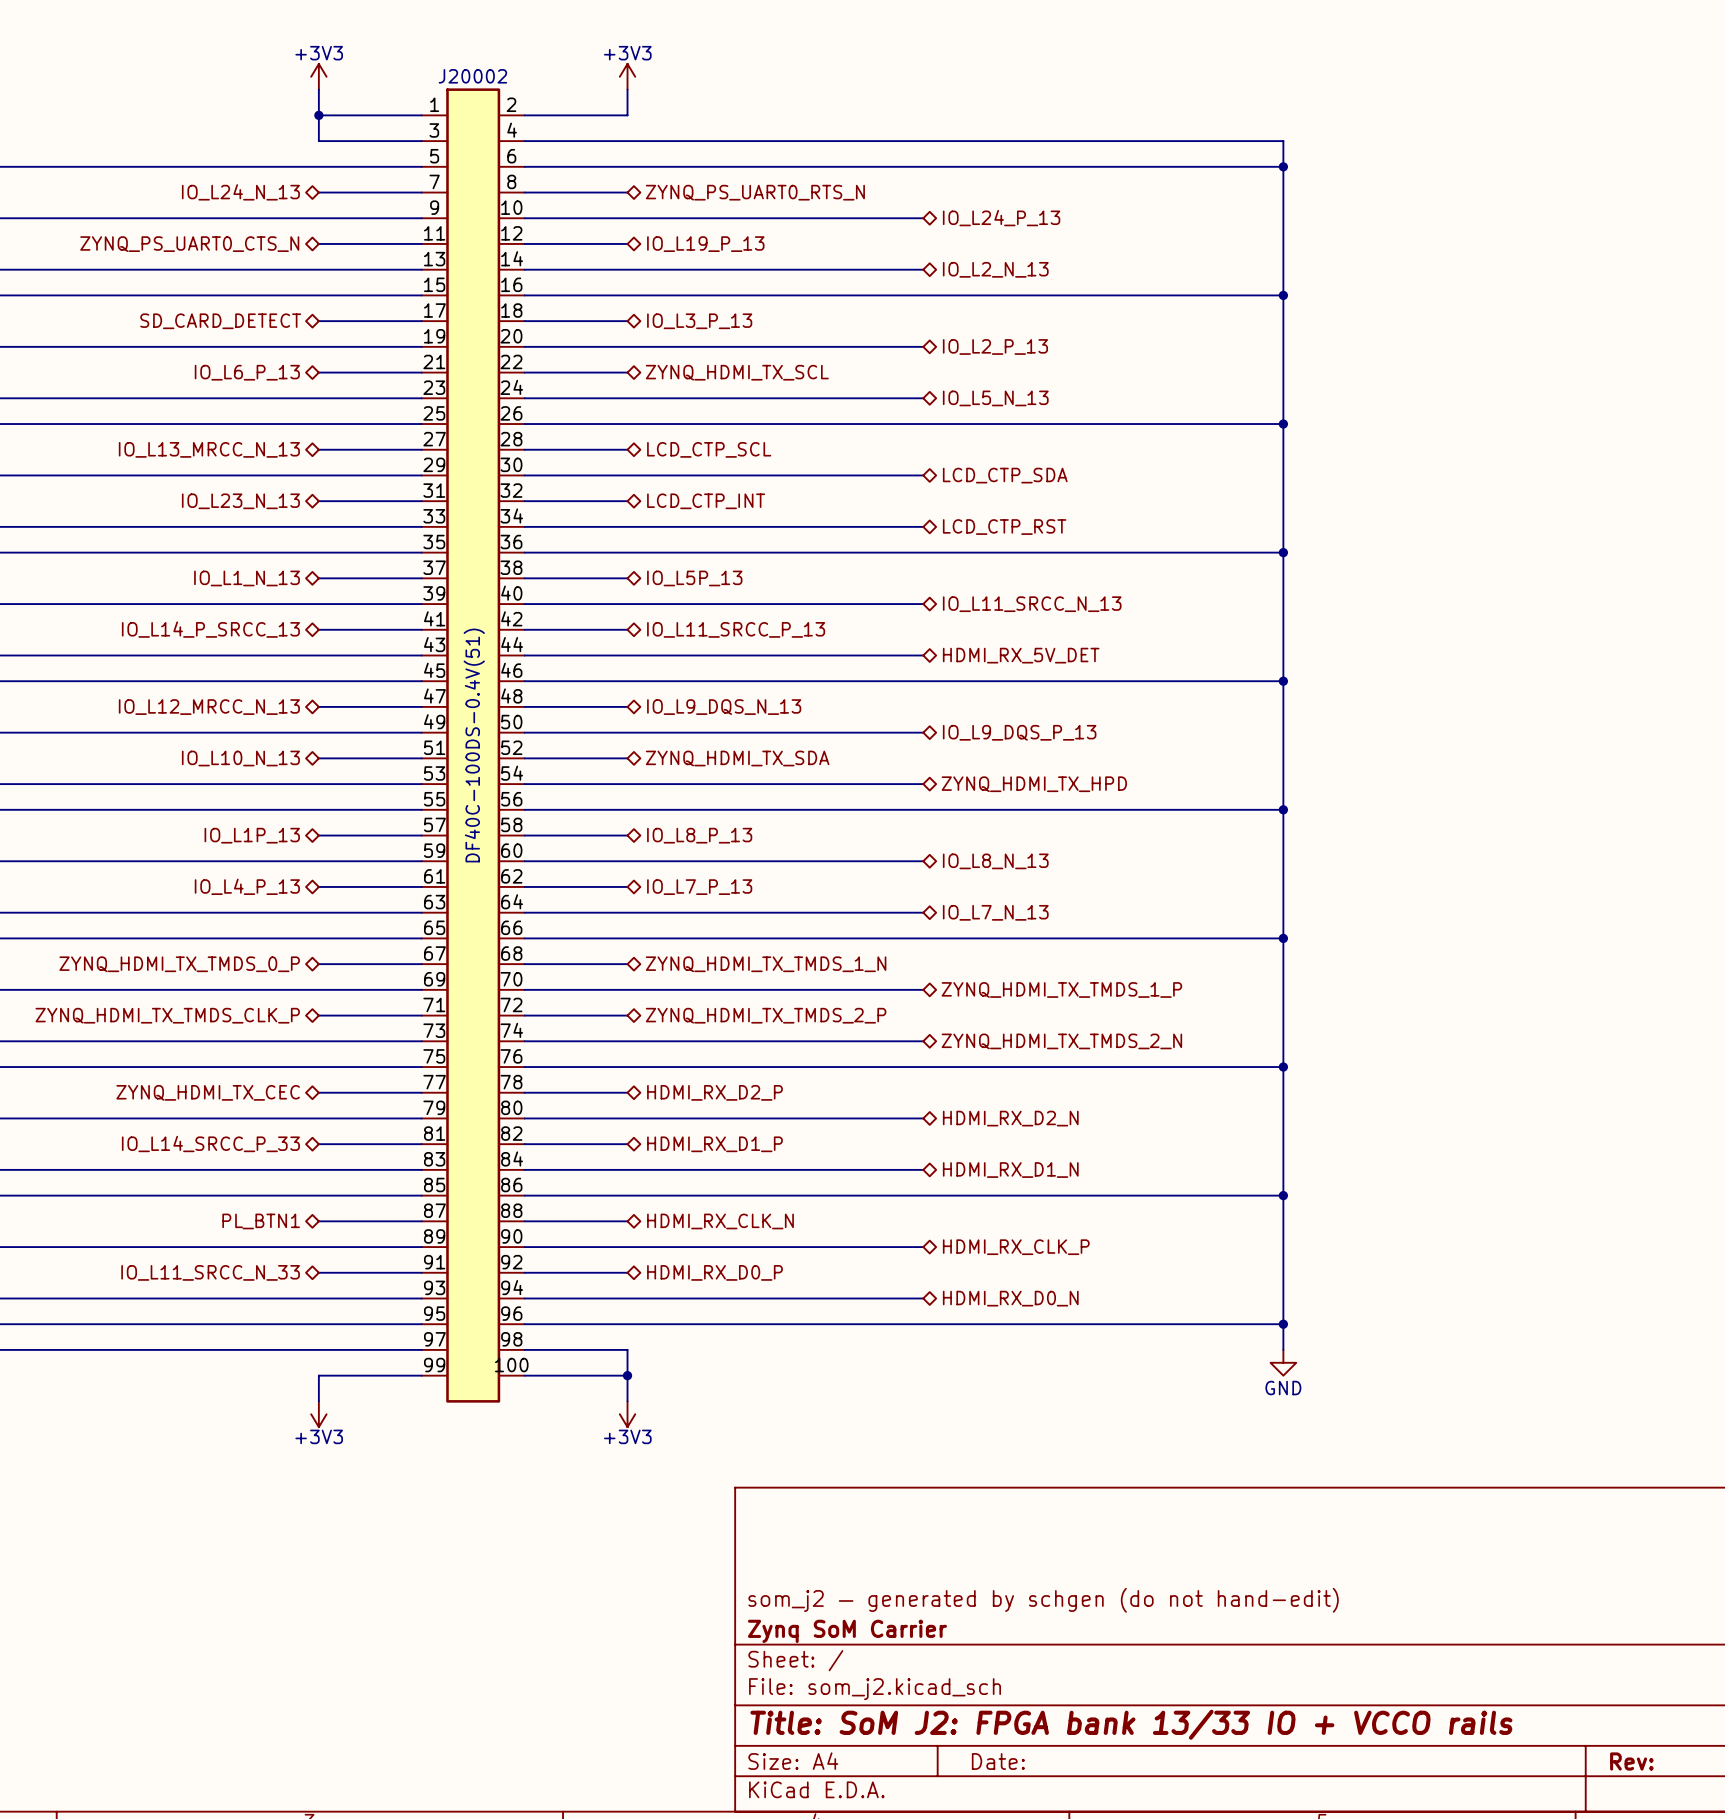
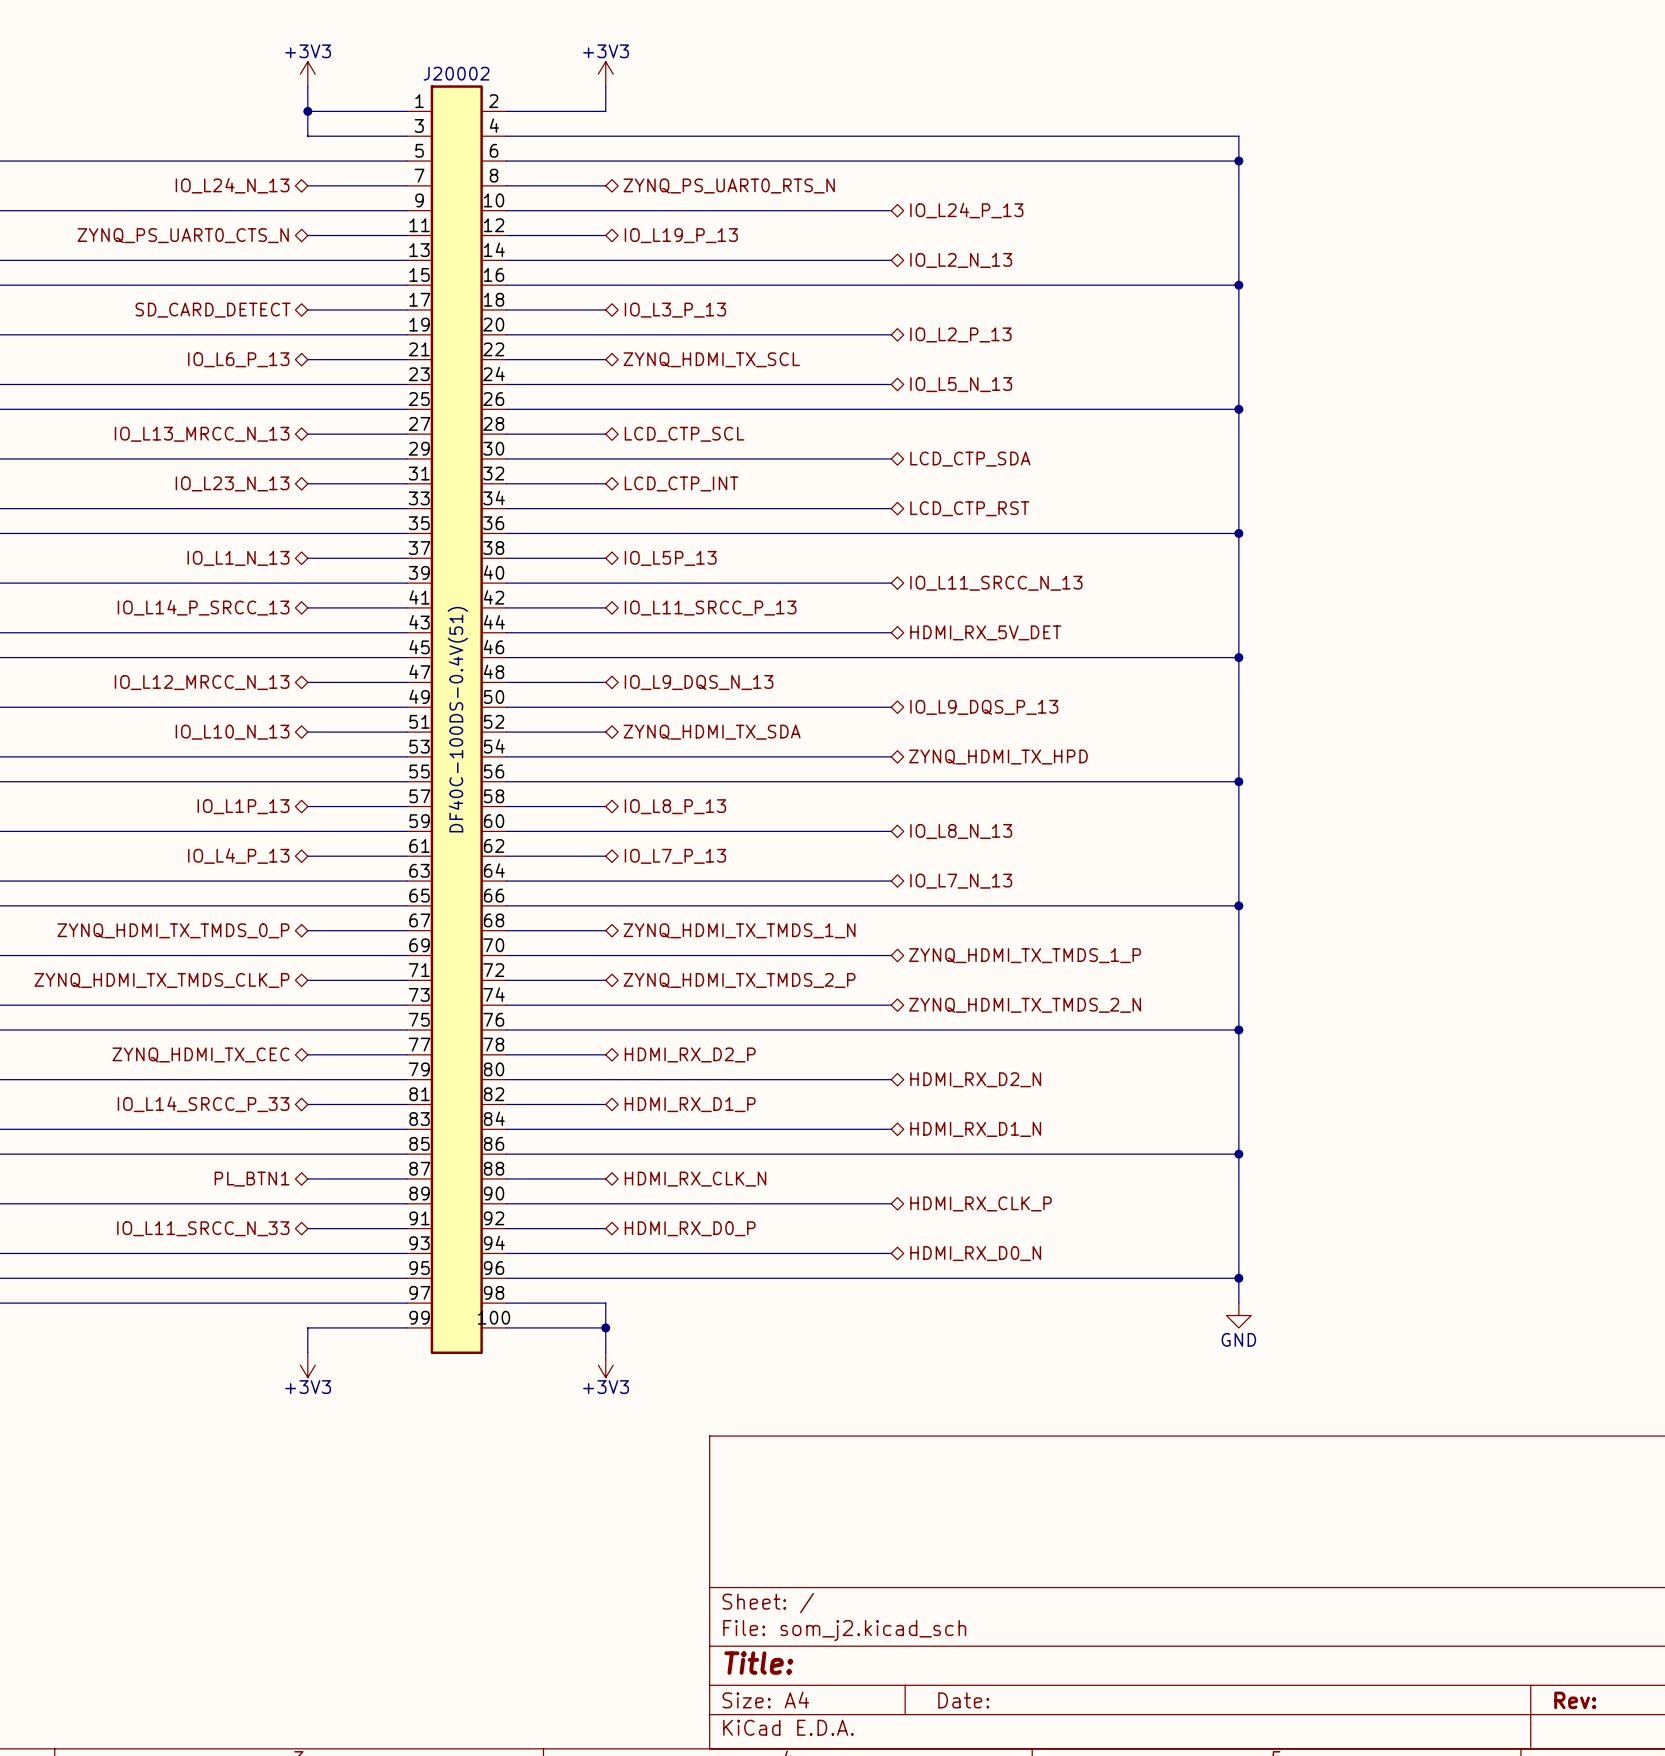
title block: som_j2 — generated by schgen (do not hand-edit) (1043, 1600) -> none
title block: Zynq SoM Carrier (847, 1631) -> none
title block: Title: SoM J2: FPGA bank 13/33 IO + VCCO rails (1131, 1724) -> Title: (758, 1663)

